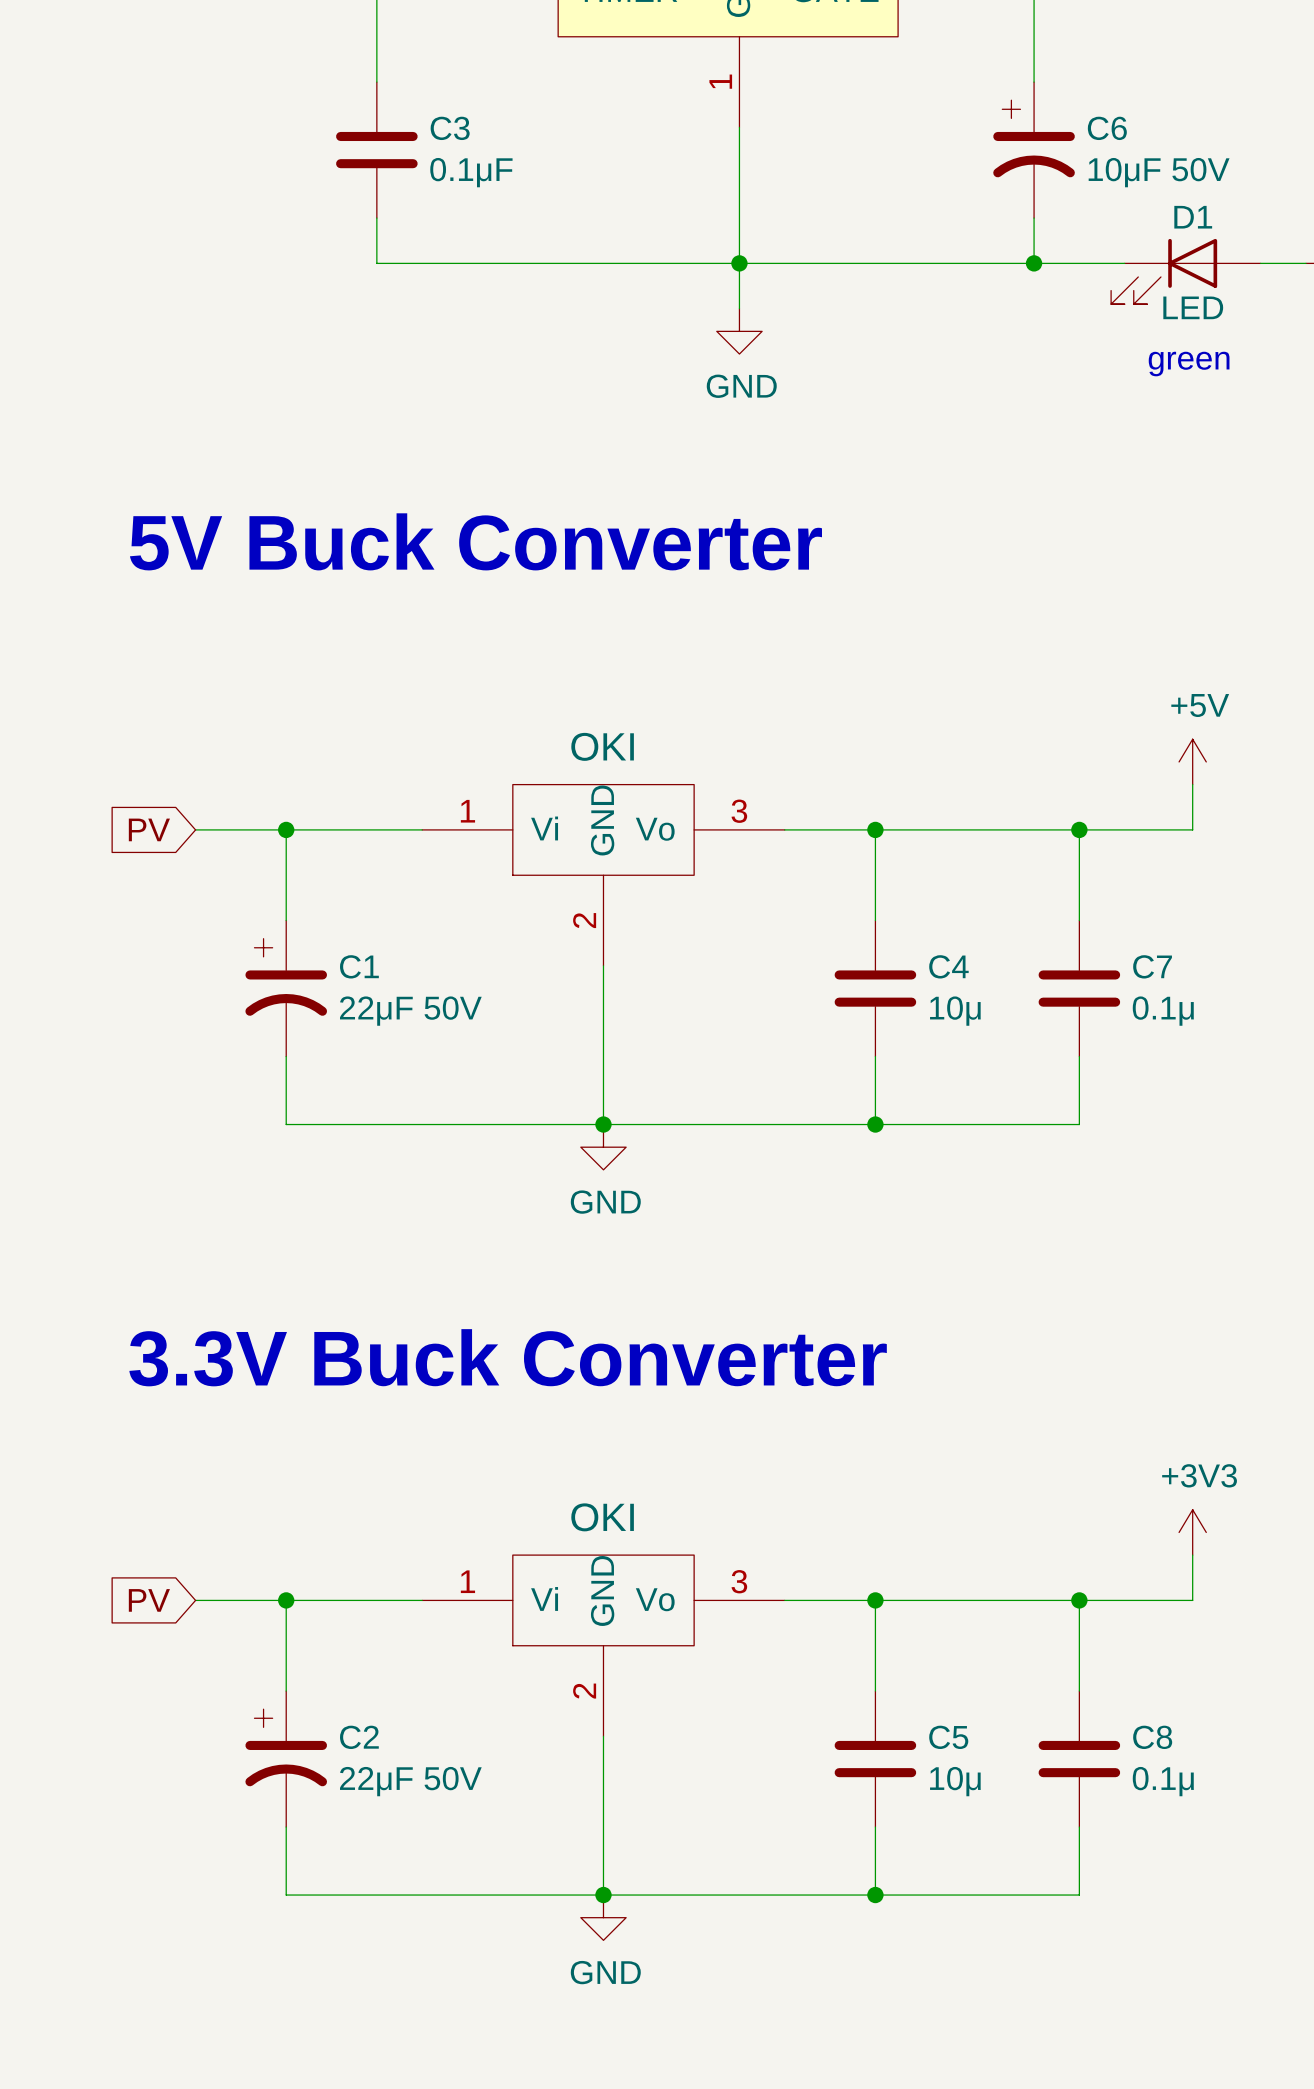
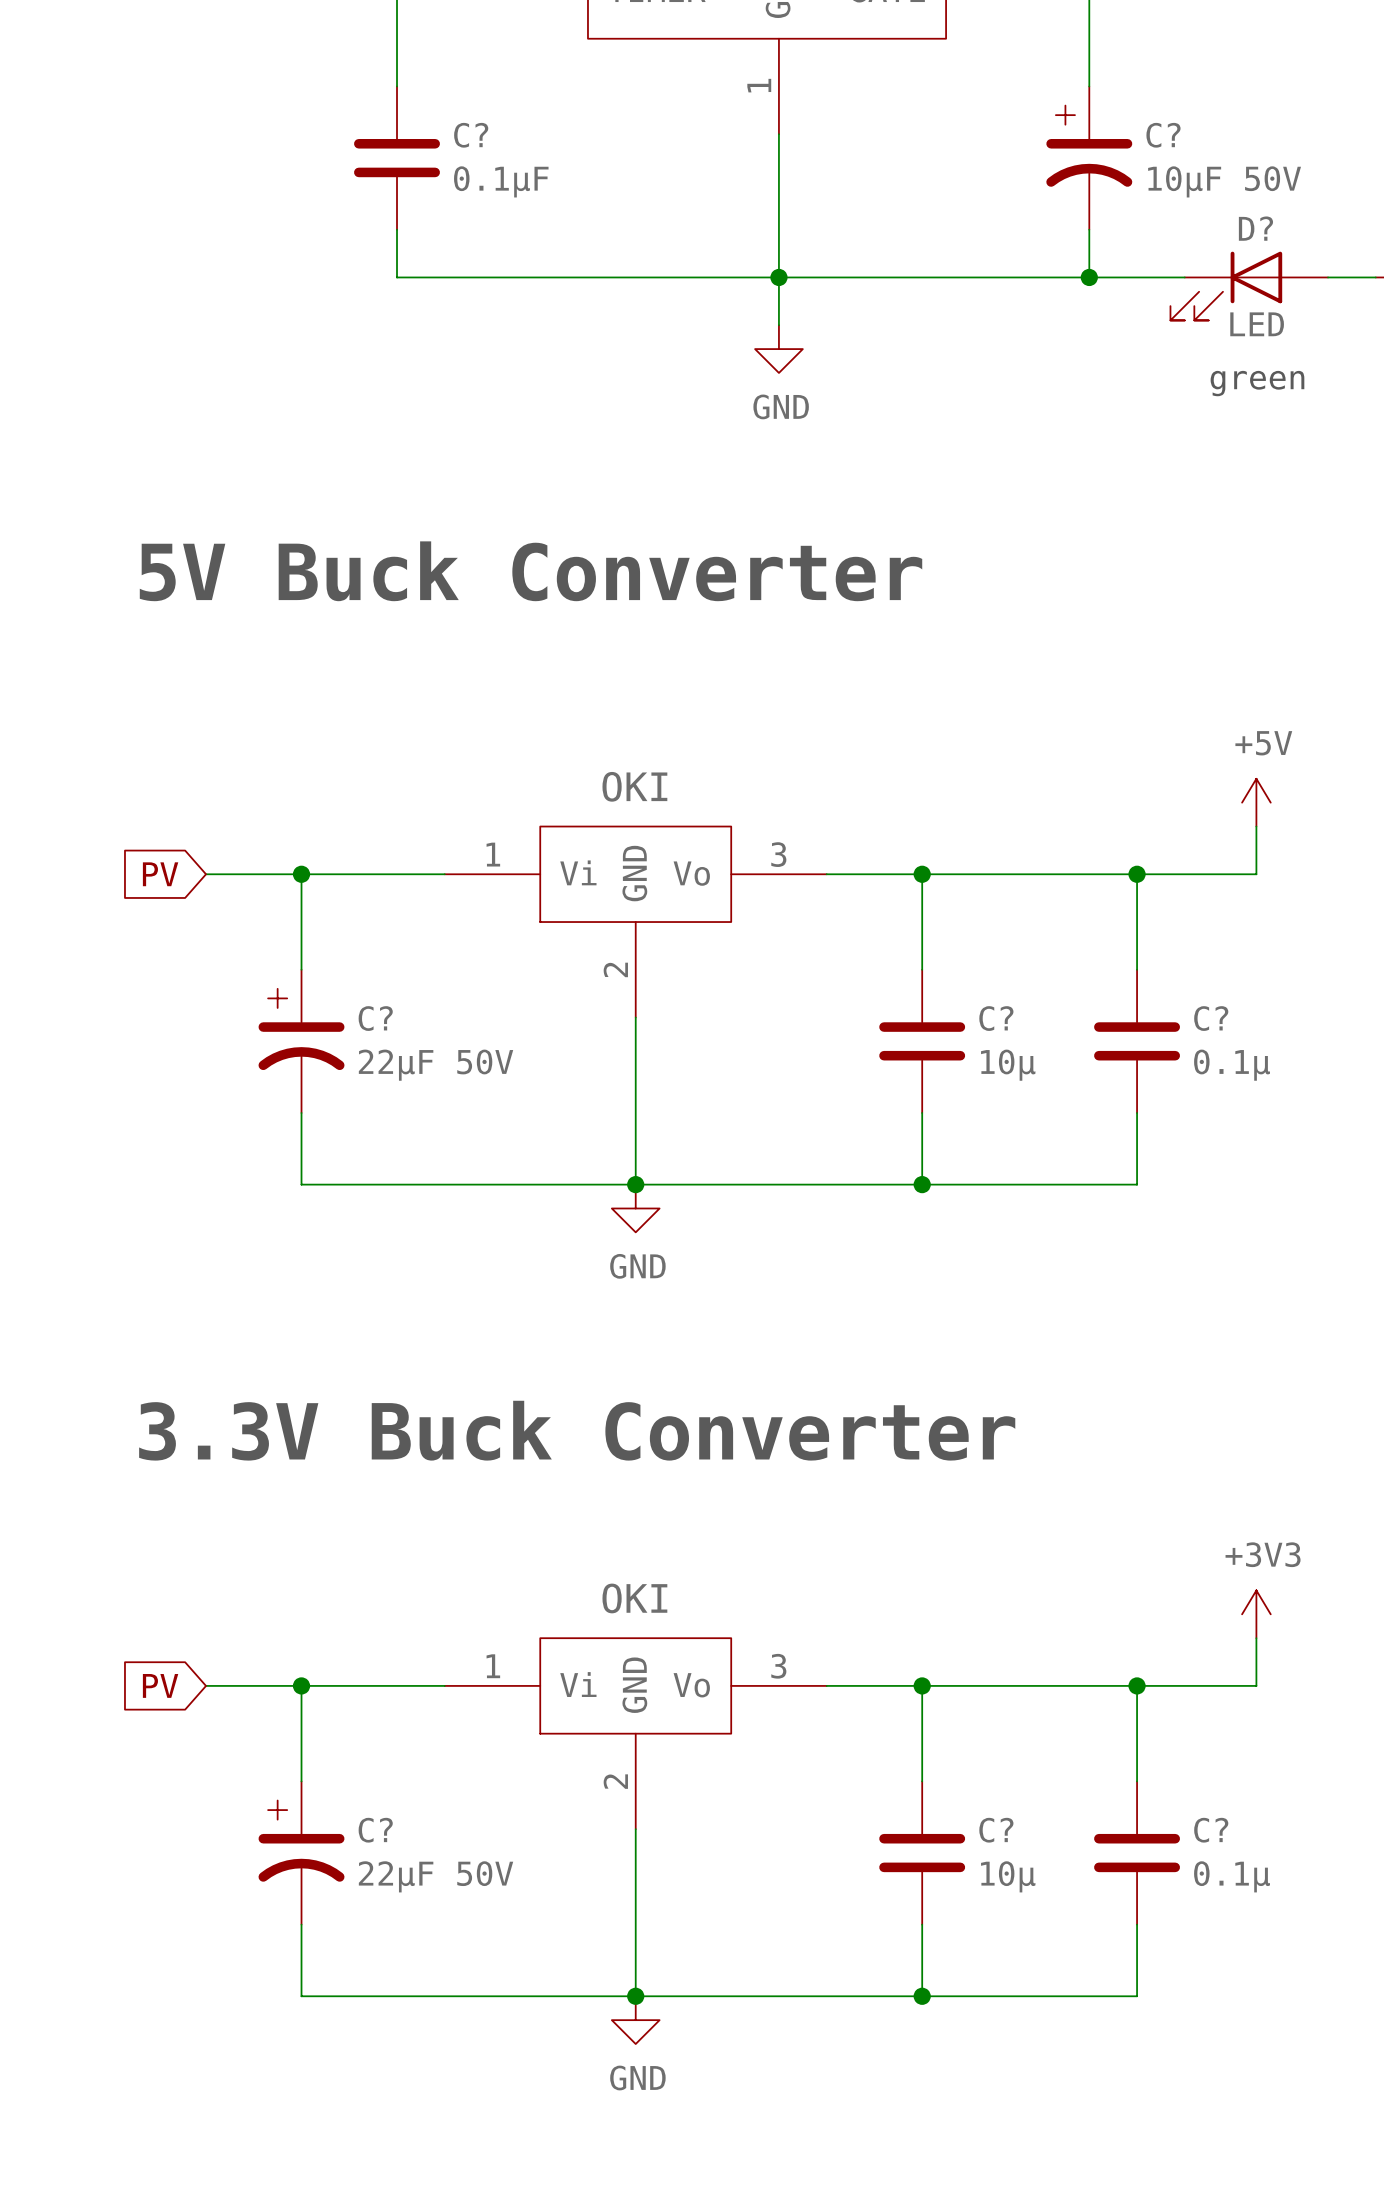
C3 name: C3 (450, 128) -> C? (471, 135)
C6 name: C6 (1107, 128) -> C? (1163, 135)
D1 name: D1 (1193, 217) -> D? (1255, 228)
C1 name: C1 (359, 966) -> C? (375, 1018)
C4 name: C4 (948, 966) -> C? (996, 1018)
C7 name: C7 (1152, 966) -> C? (1211, 1018)
C2 name: C2 (359, 1737) -> C? (375, 1830)
C5 name: C5 (948, 1737) -> C? (996, 1830)
C8 name: C8 (1152, 1737) -> C? (1211, 1830)

